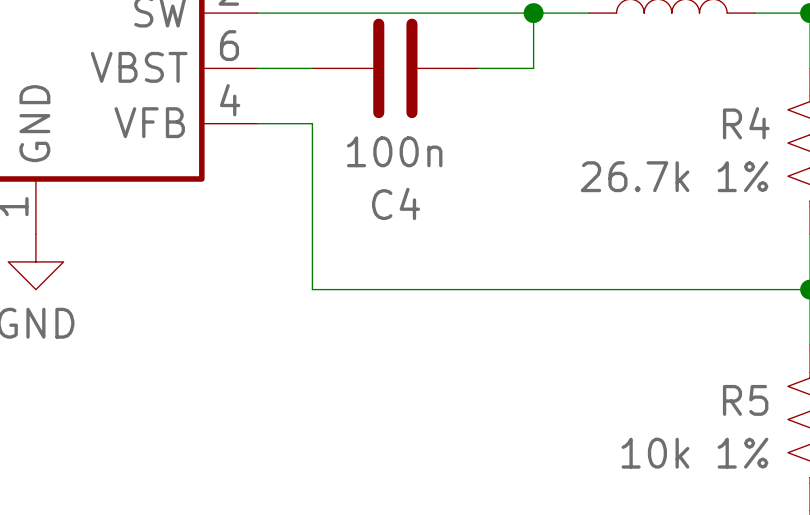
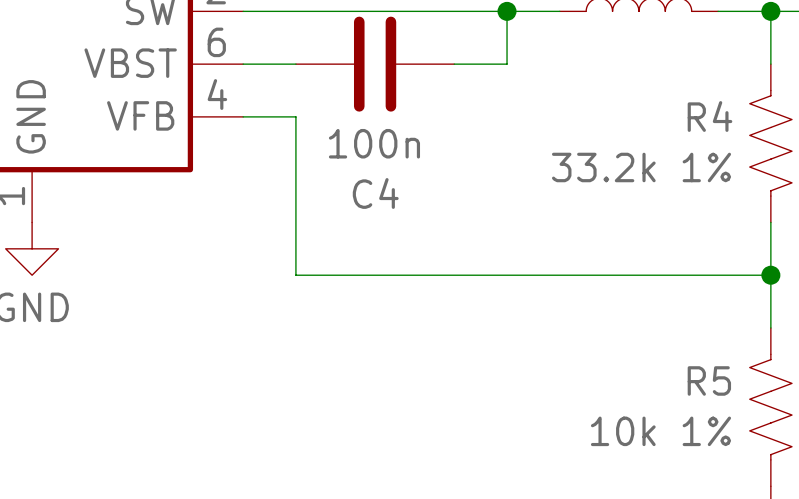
R4 value: 26.7k 1% (674, 176) -> 33.2k 1% (641, 167)

